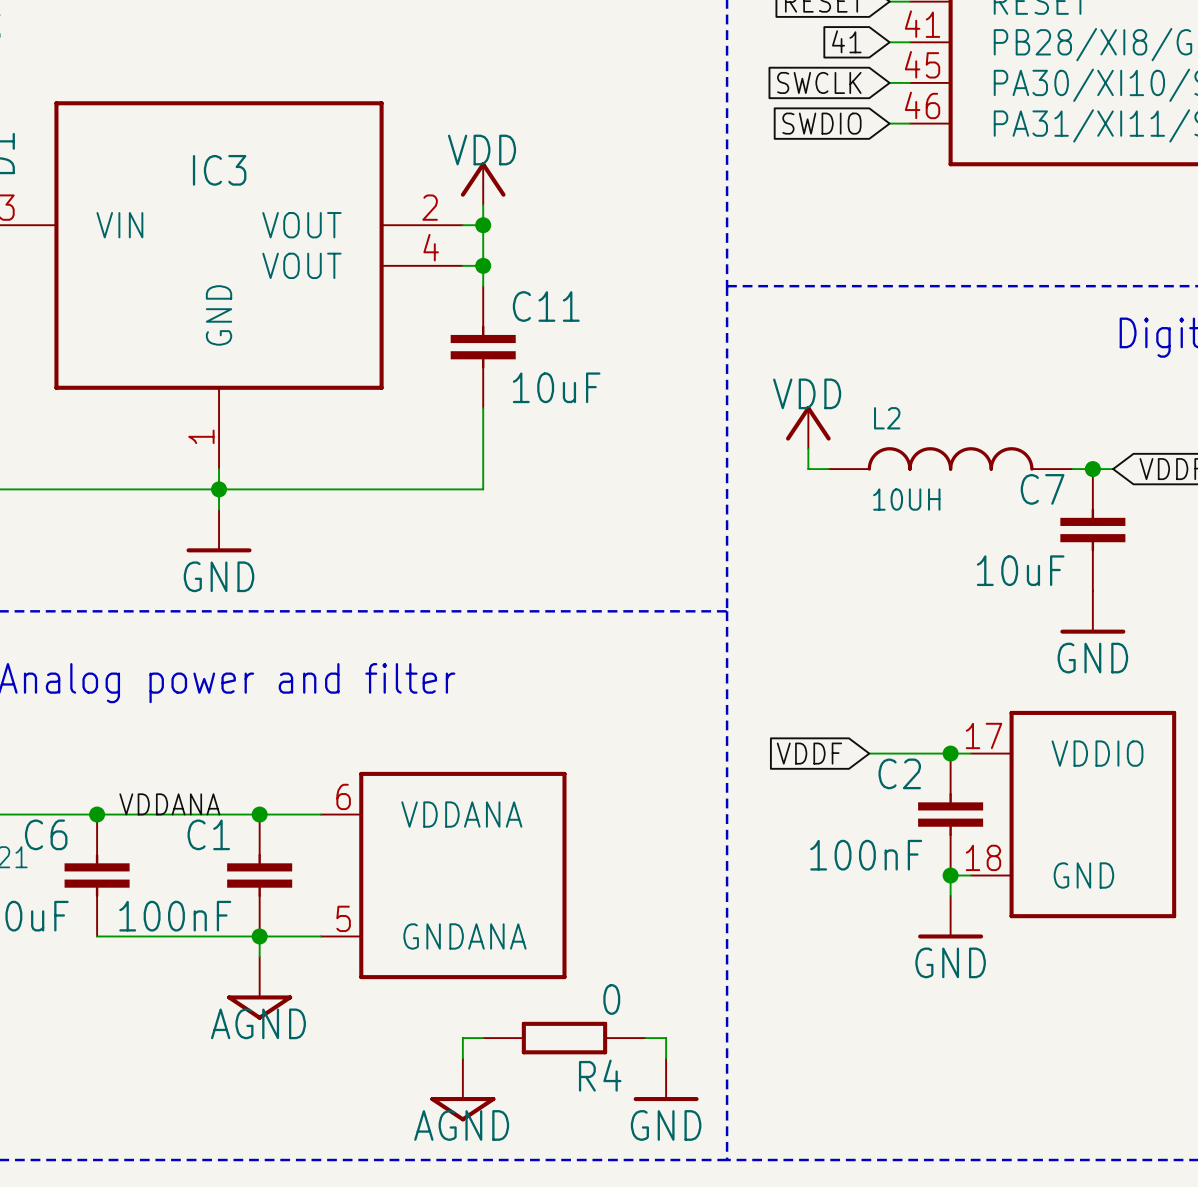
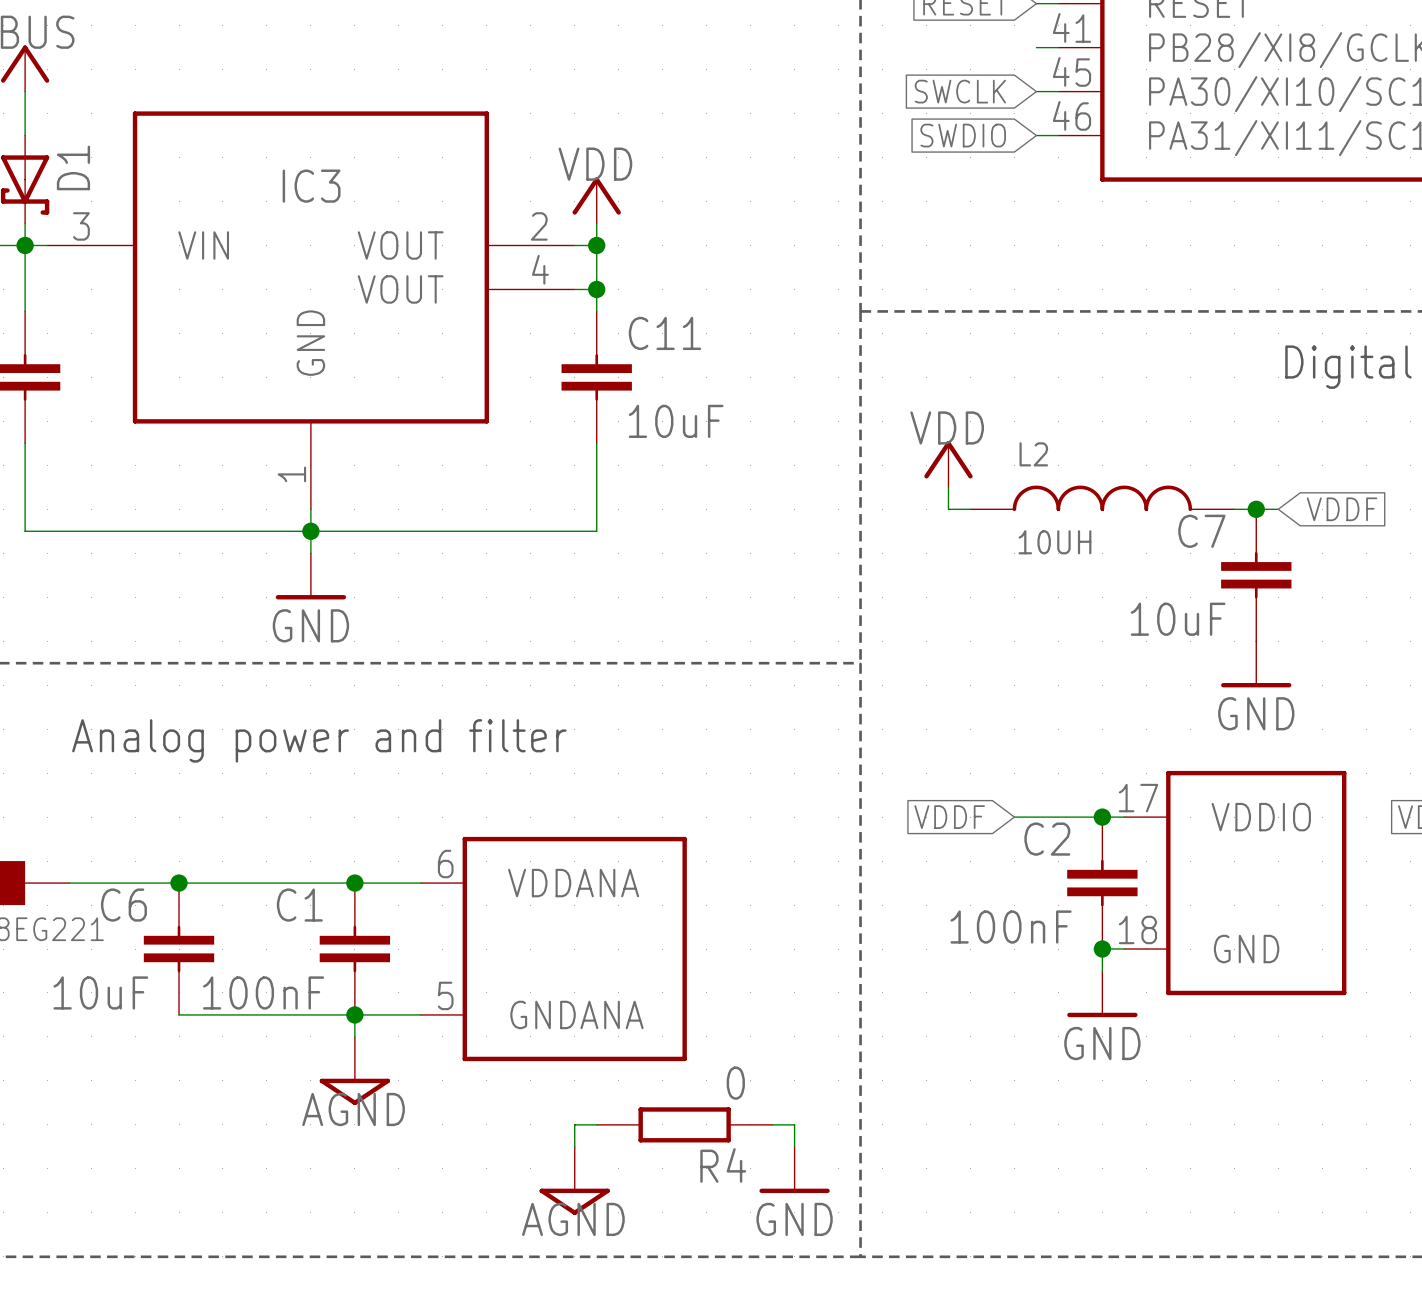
global label: 41 (846, 41) -> none
label: VDDANA (169, 804) -> none

